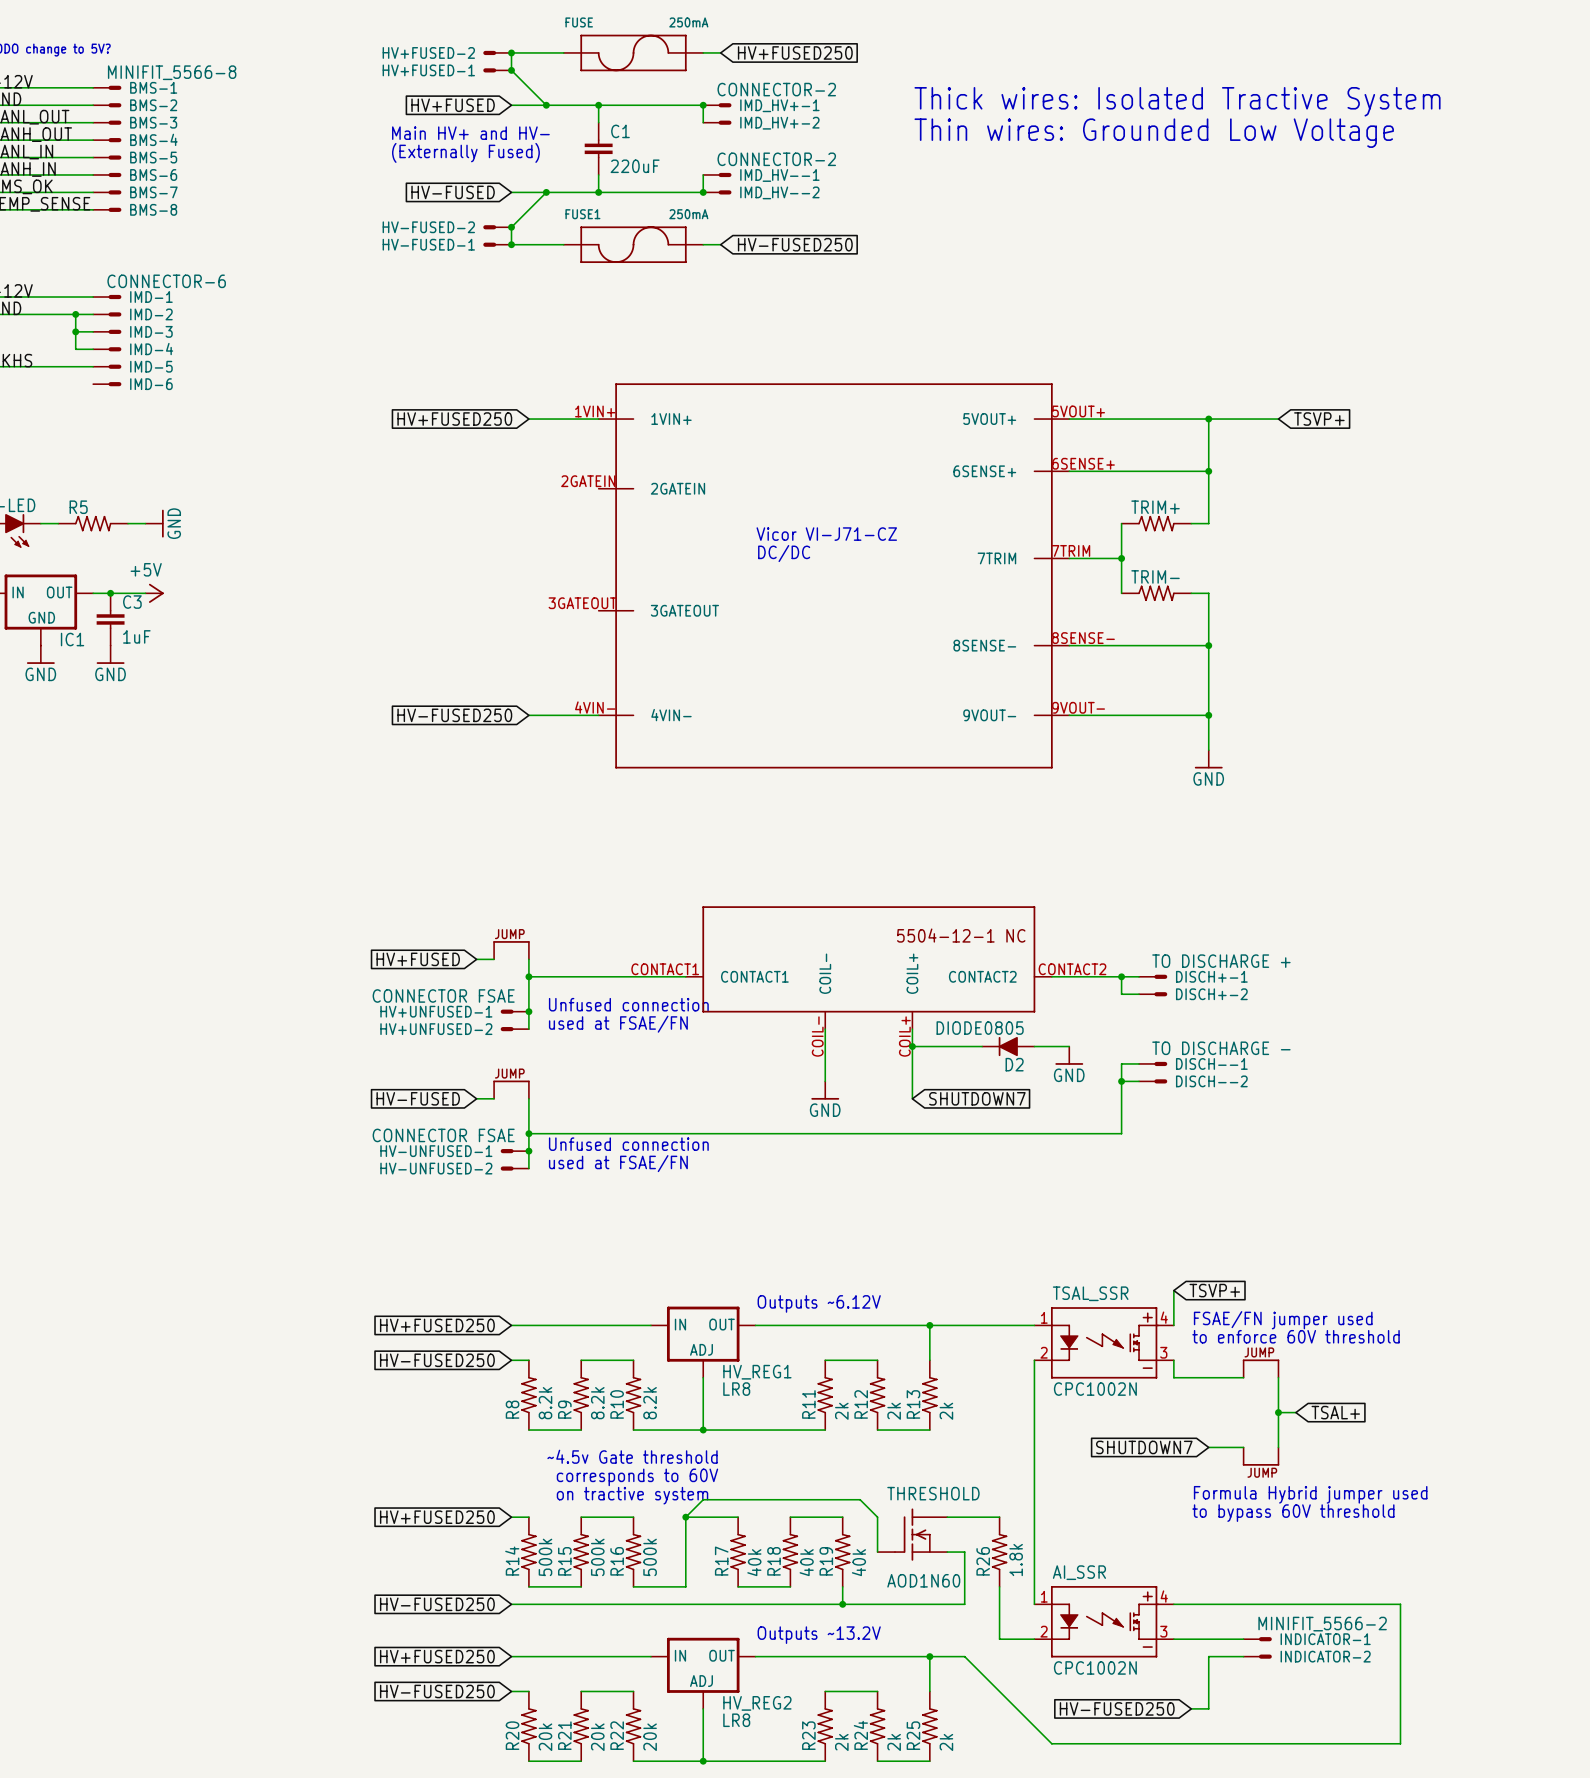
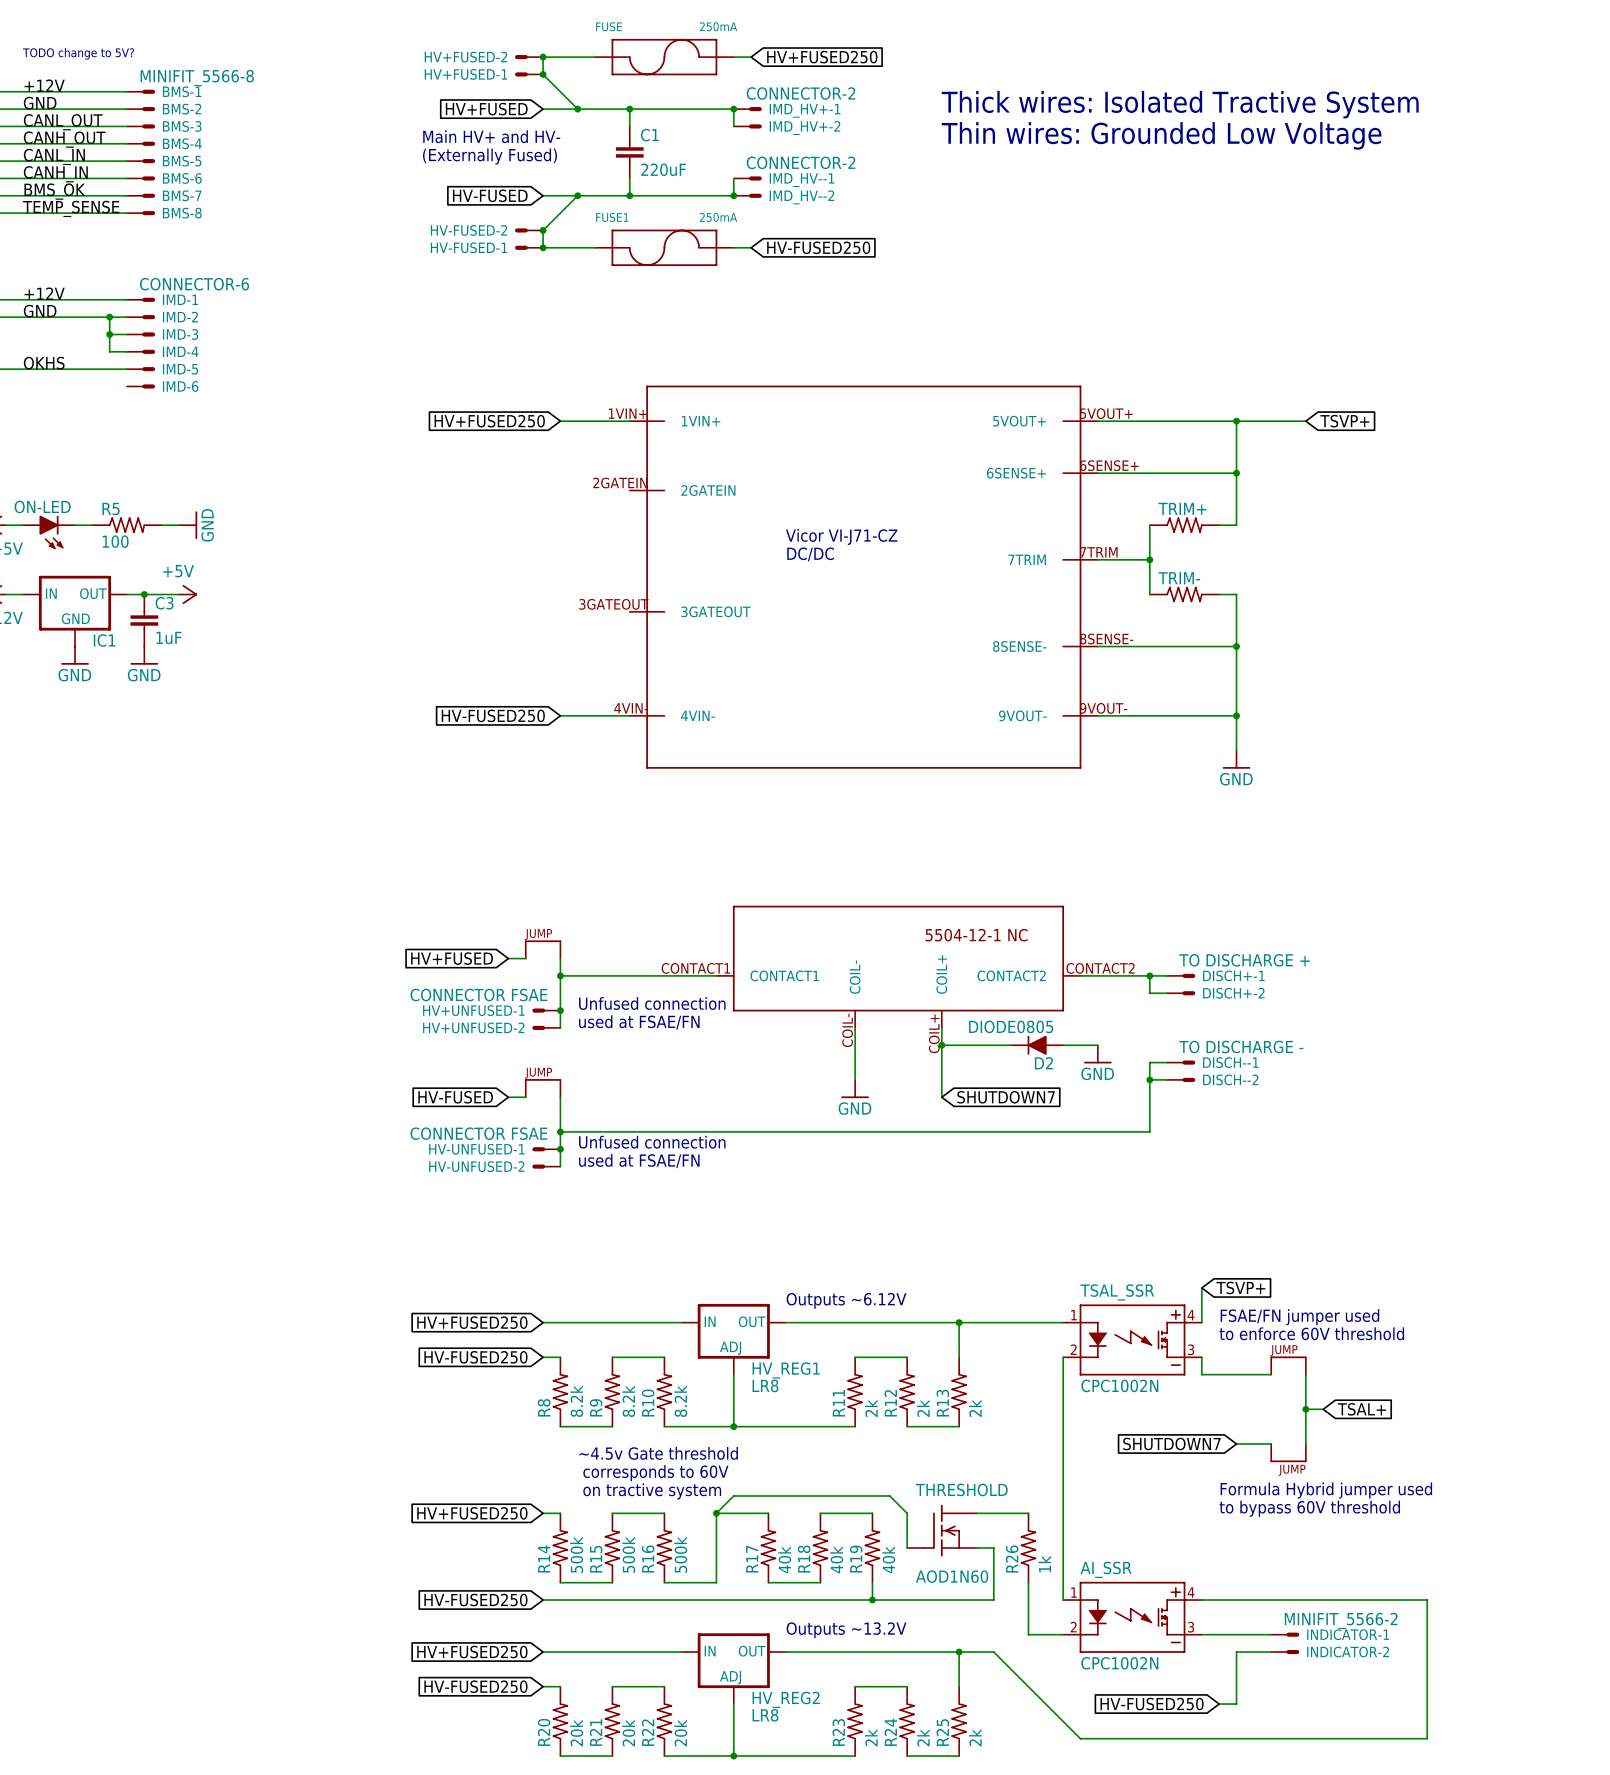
R5 value: none -> 100 (115, 541)
R26 value: 1.8k (1016, 1560) -> 1k (1044, 1564)

